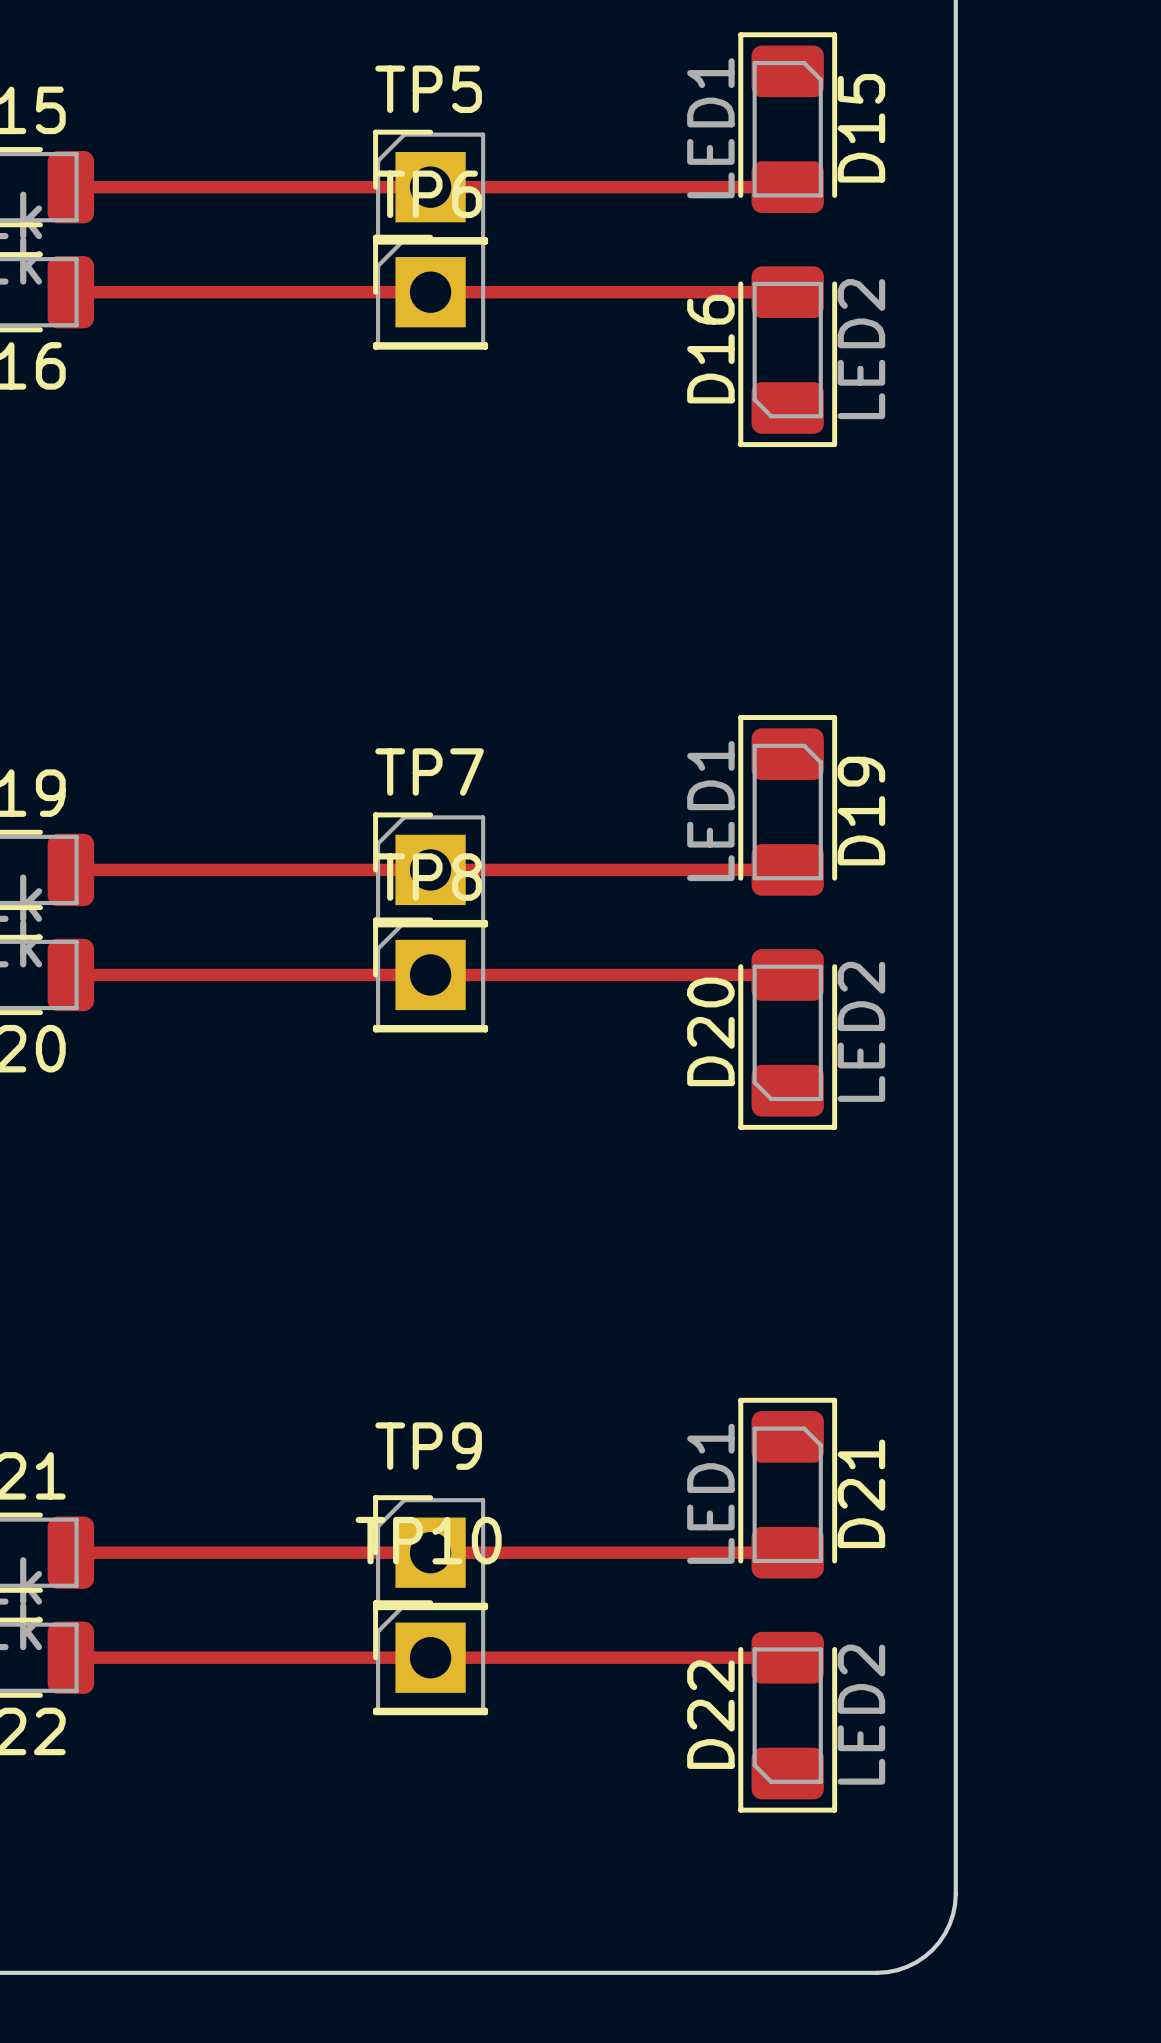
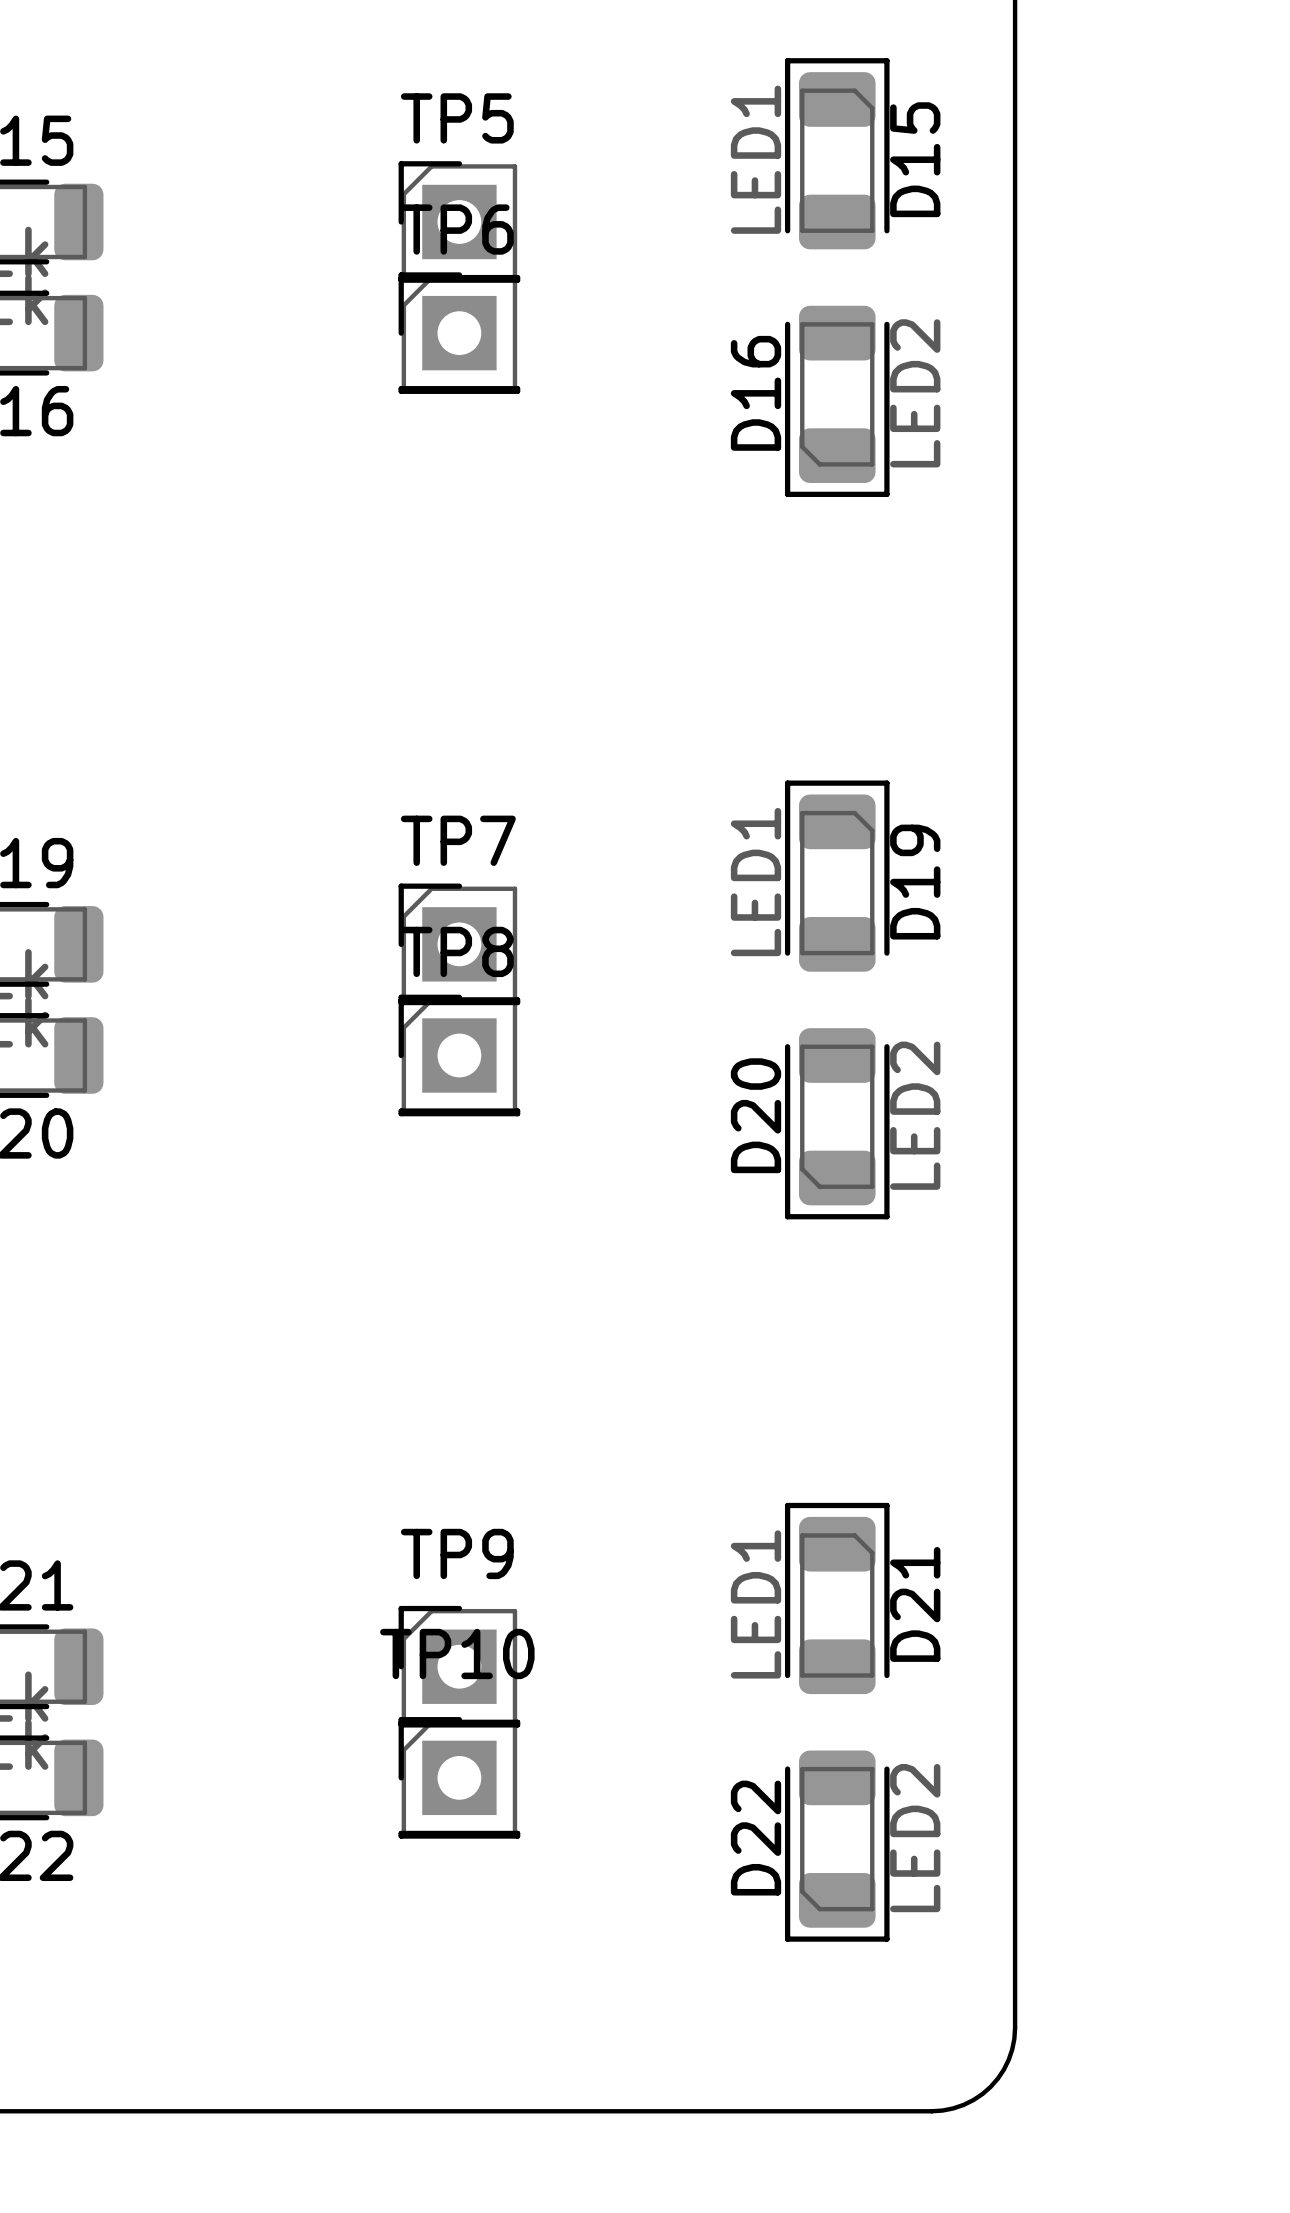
track: (70, 187) (787, 187) -> none
track: (70, 292) (787, 292) -> none
track: (70, 869) (787, 869) -> none
track: (70, 974) (787, 974) -> none
track: (70, 1552) (787, 1552) -> none
track: (70, 1657) (787, 1657) -> none

